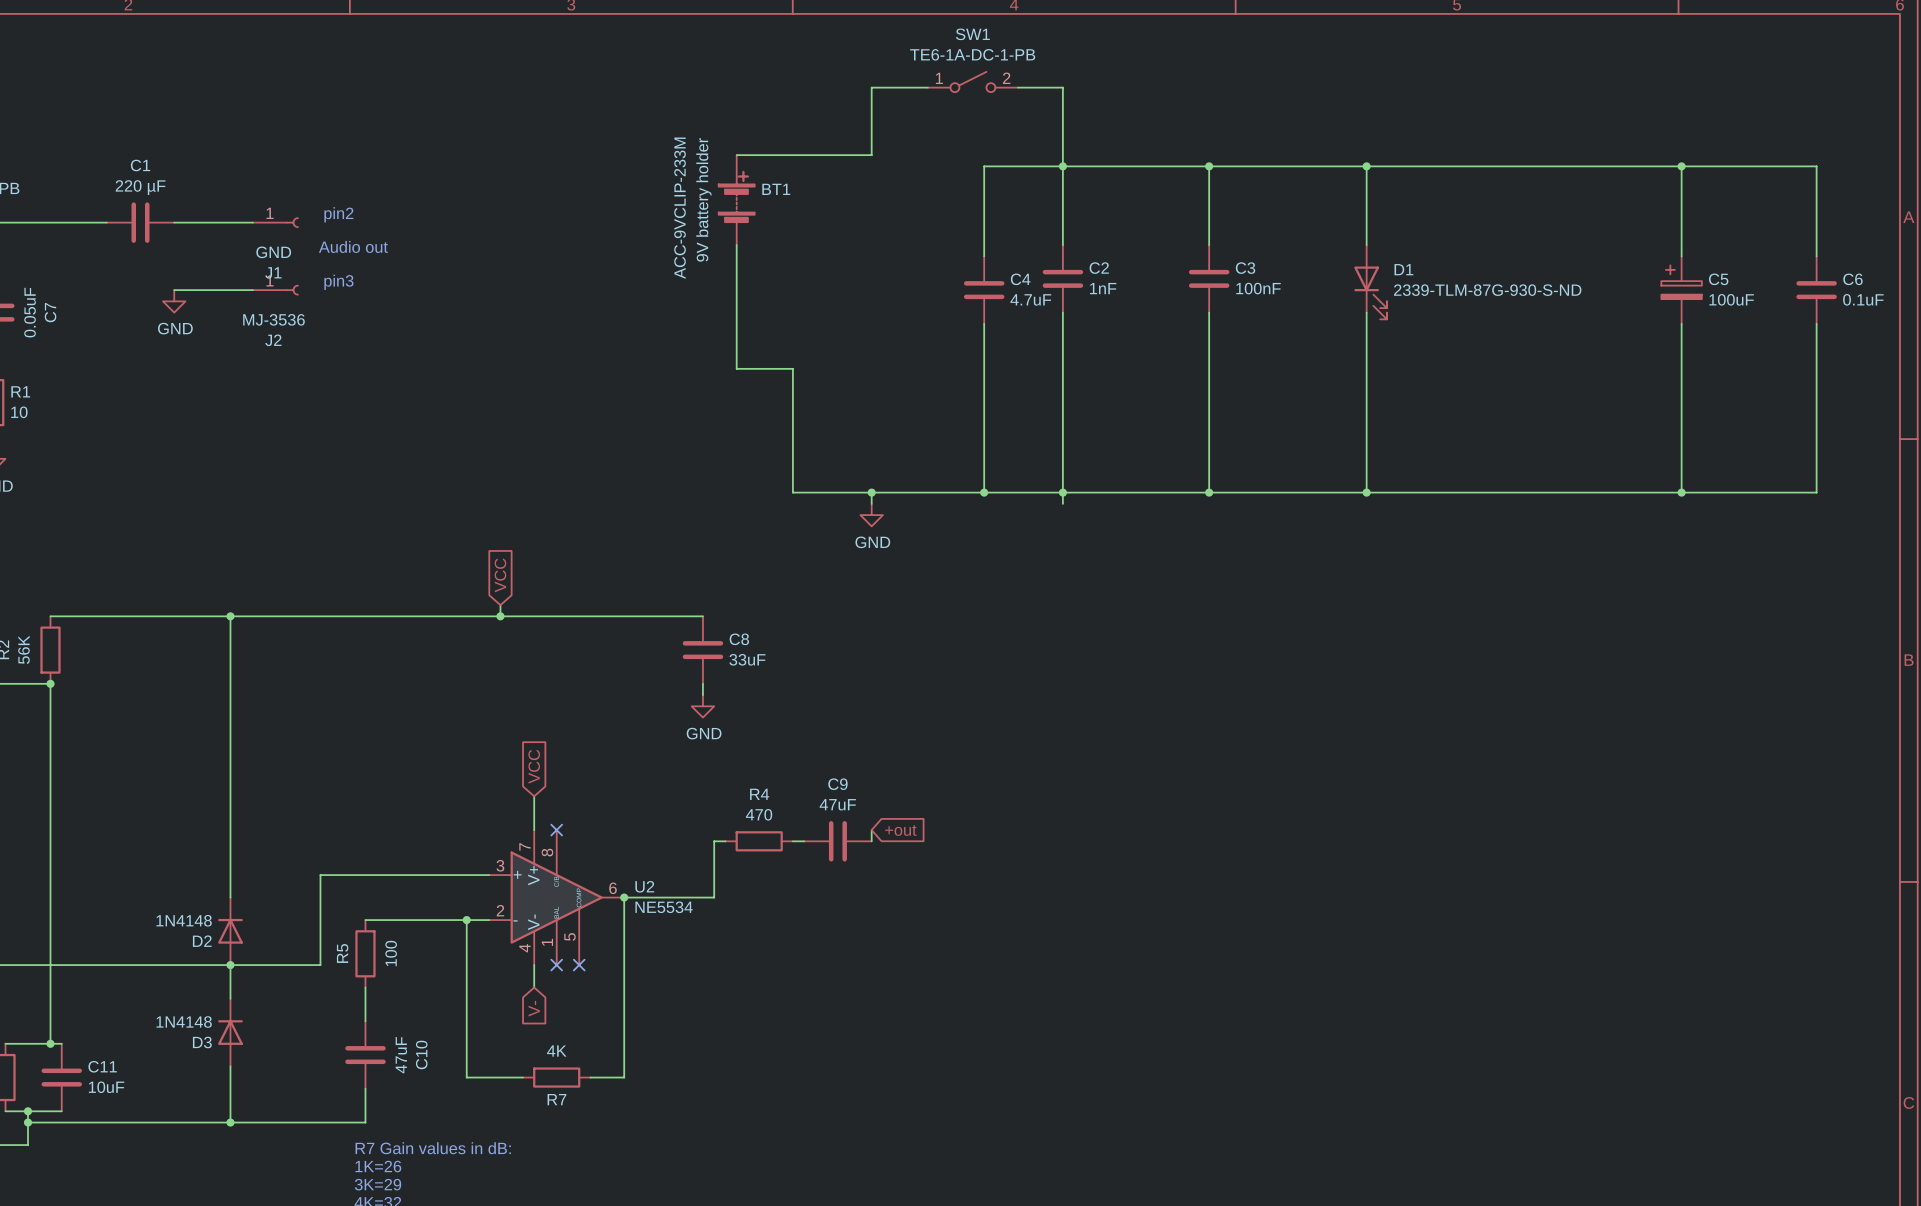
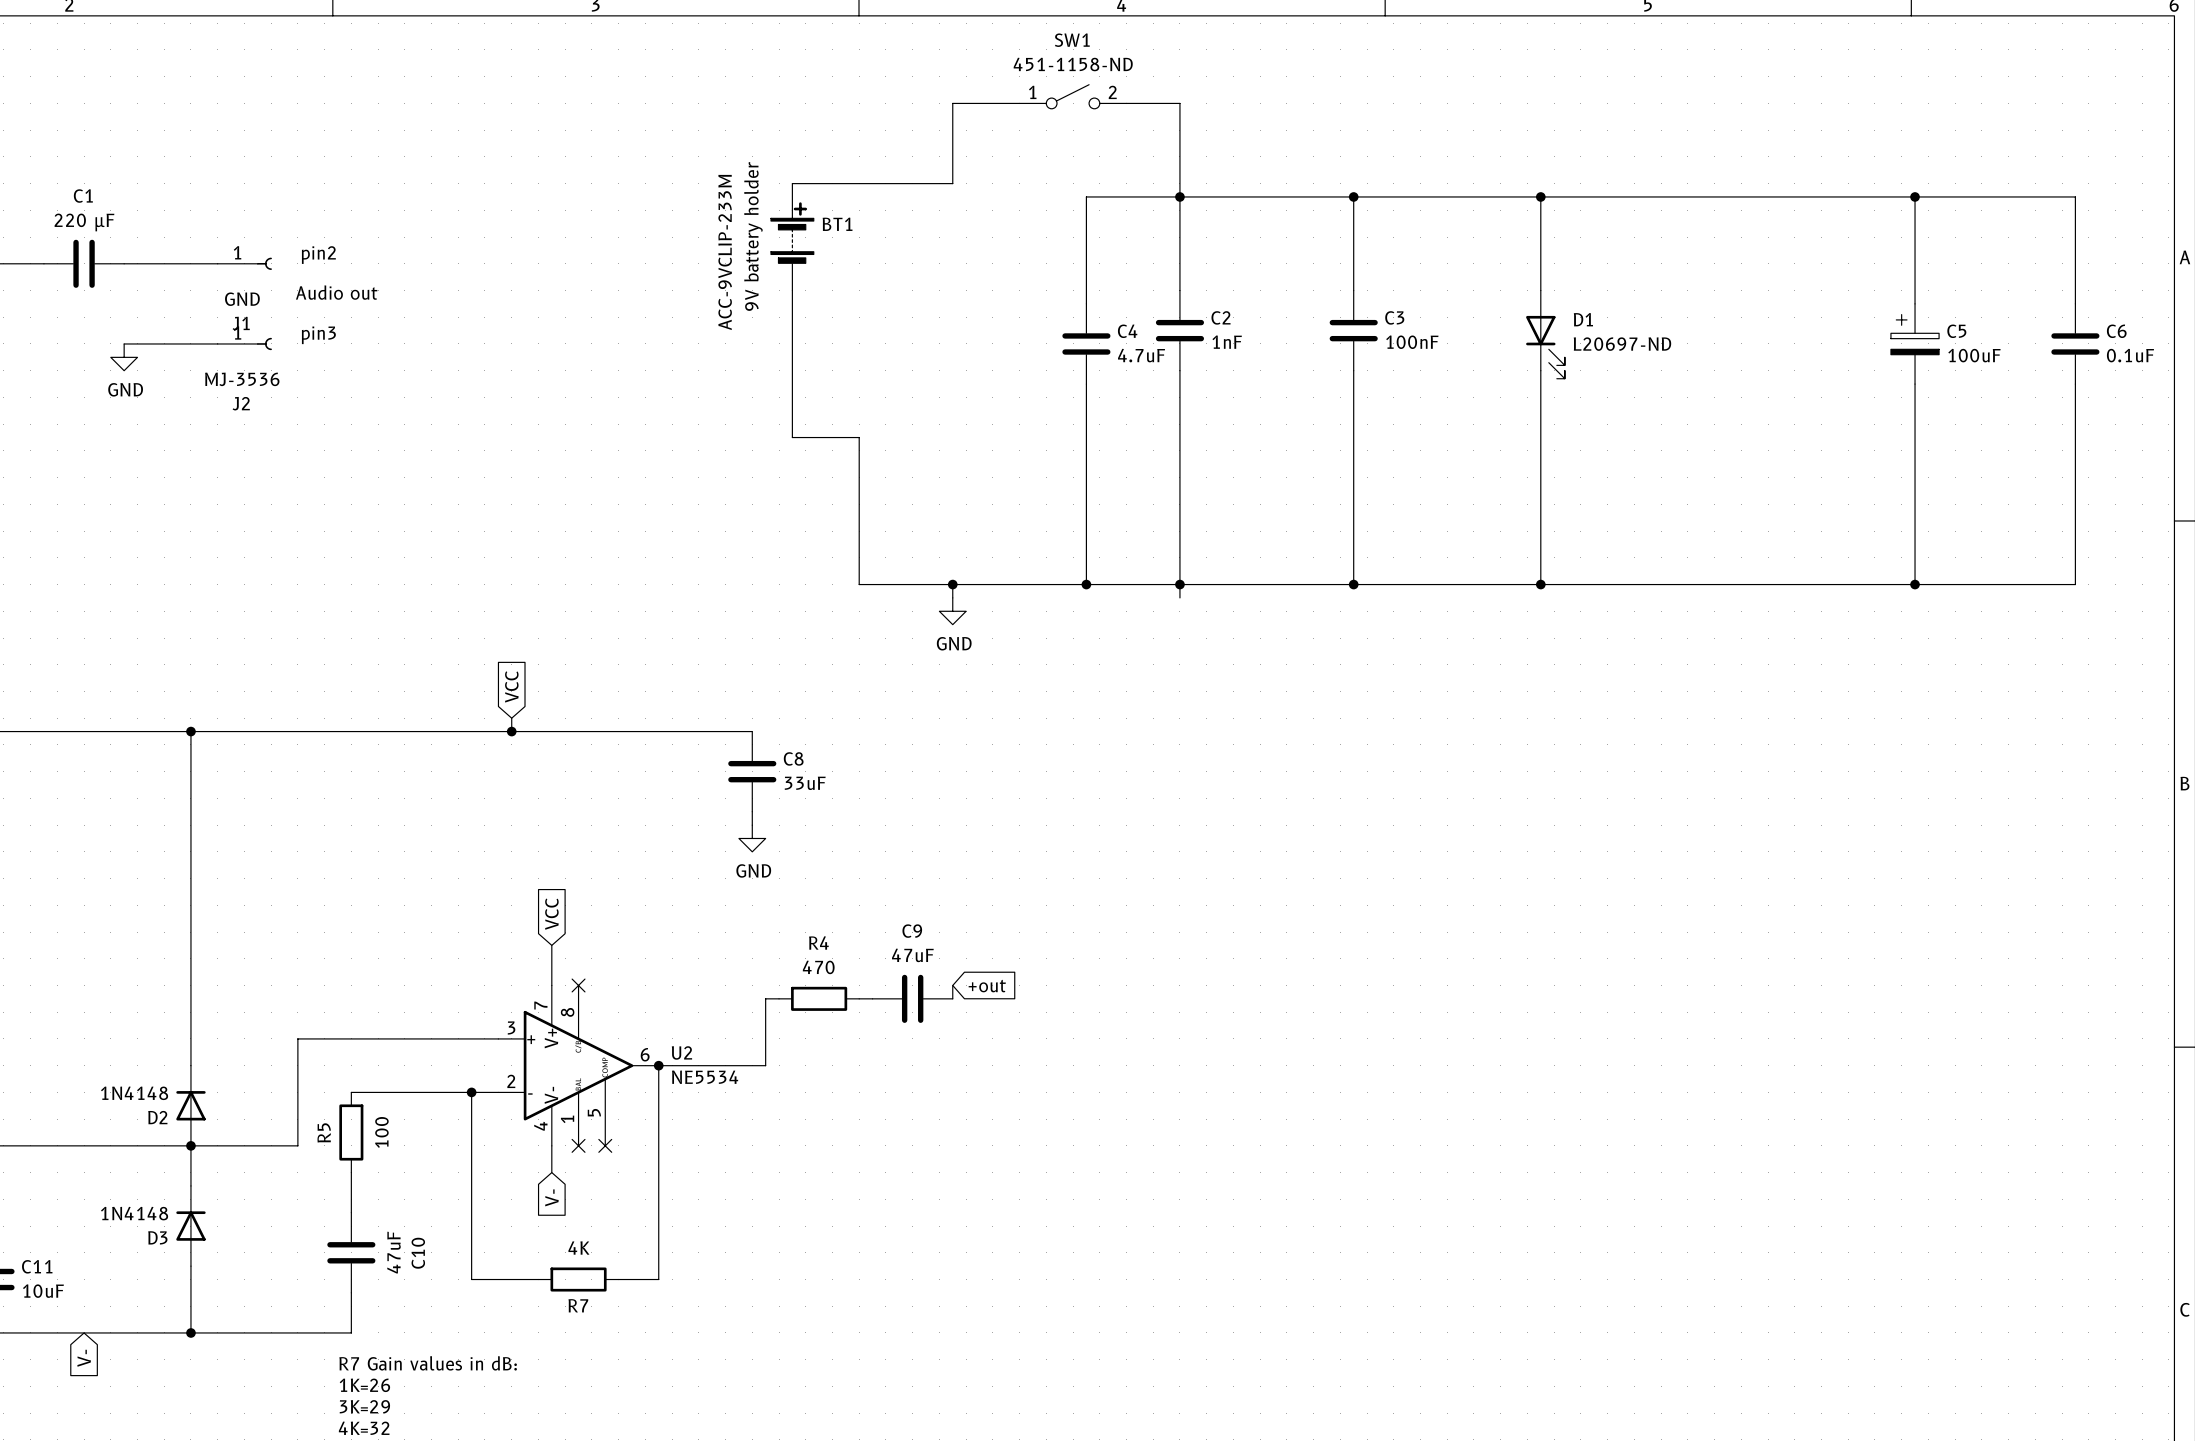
SW1 value: TE6-1A-DC-1-PB (972, 54) -> 451-1158-ND (1073, 64)
D1 value: 2339-TLM-87G-930-S-ND (1487, 290) -> L20697-ND (1622, 344)
global label: none -> V- (84, 1358)

